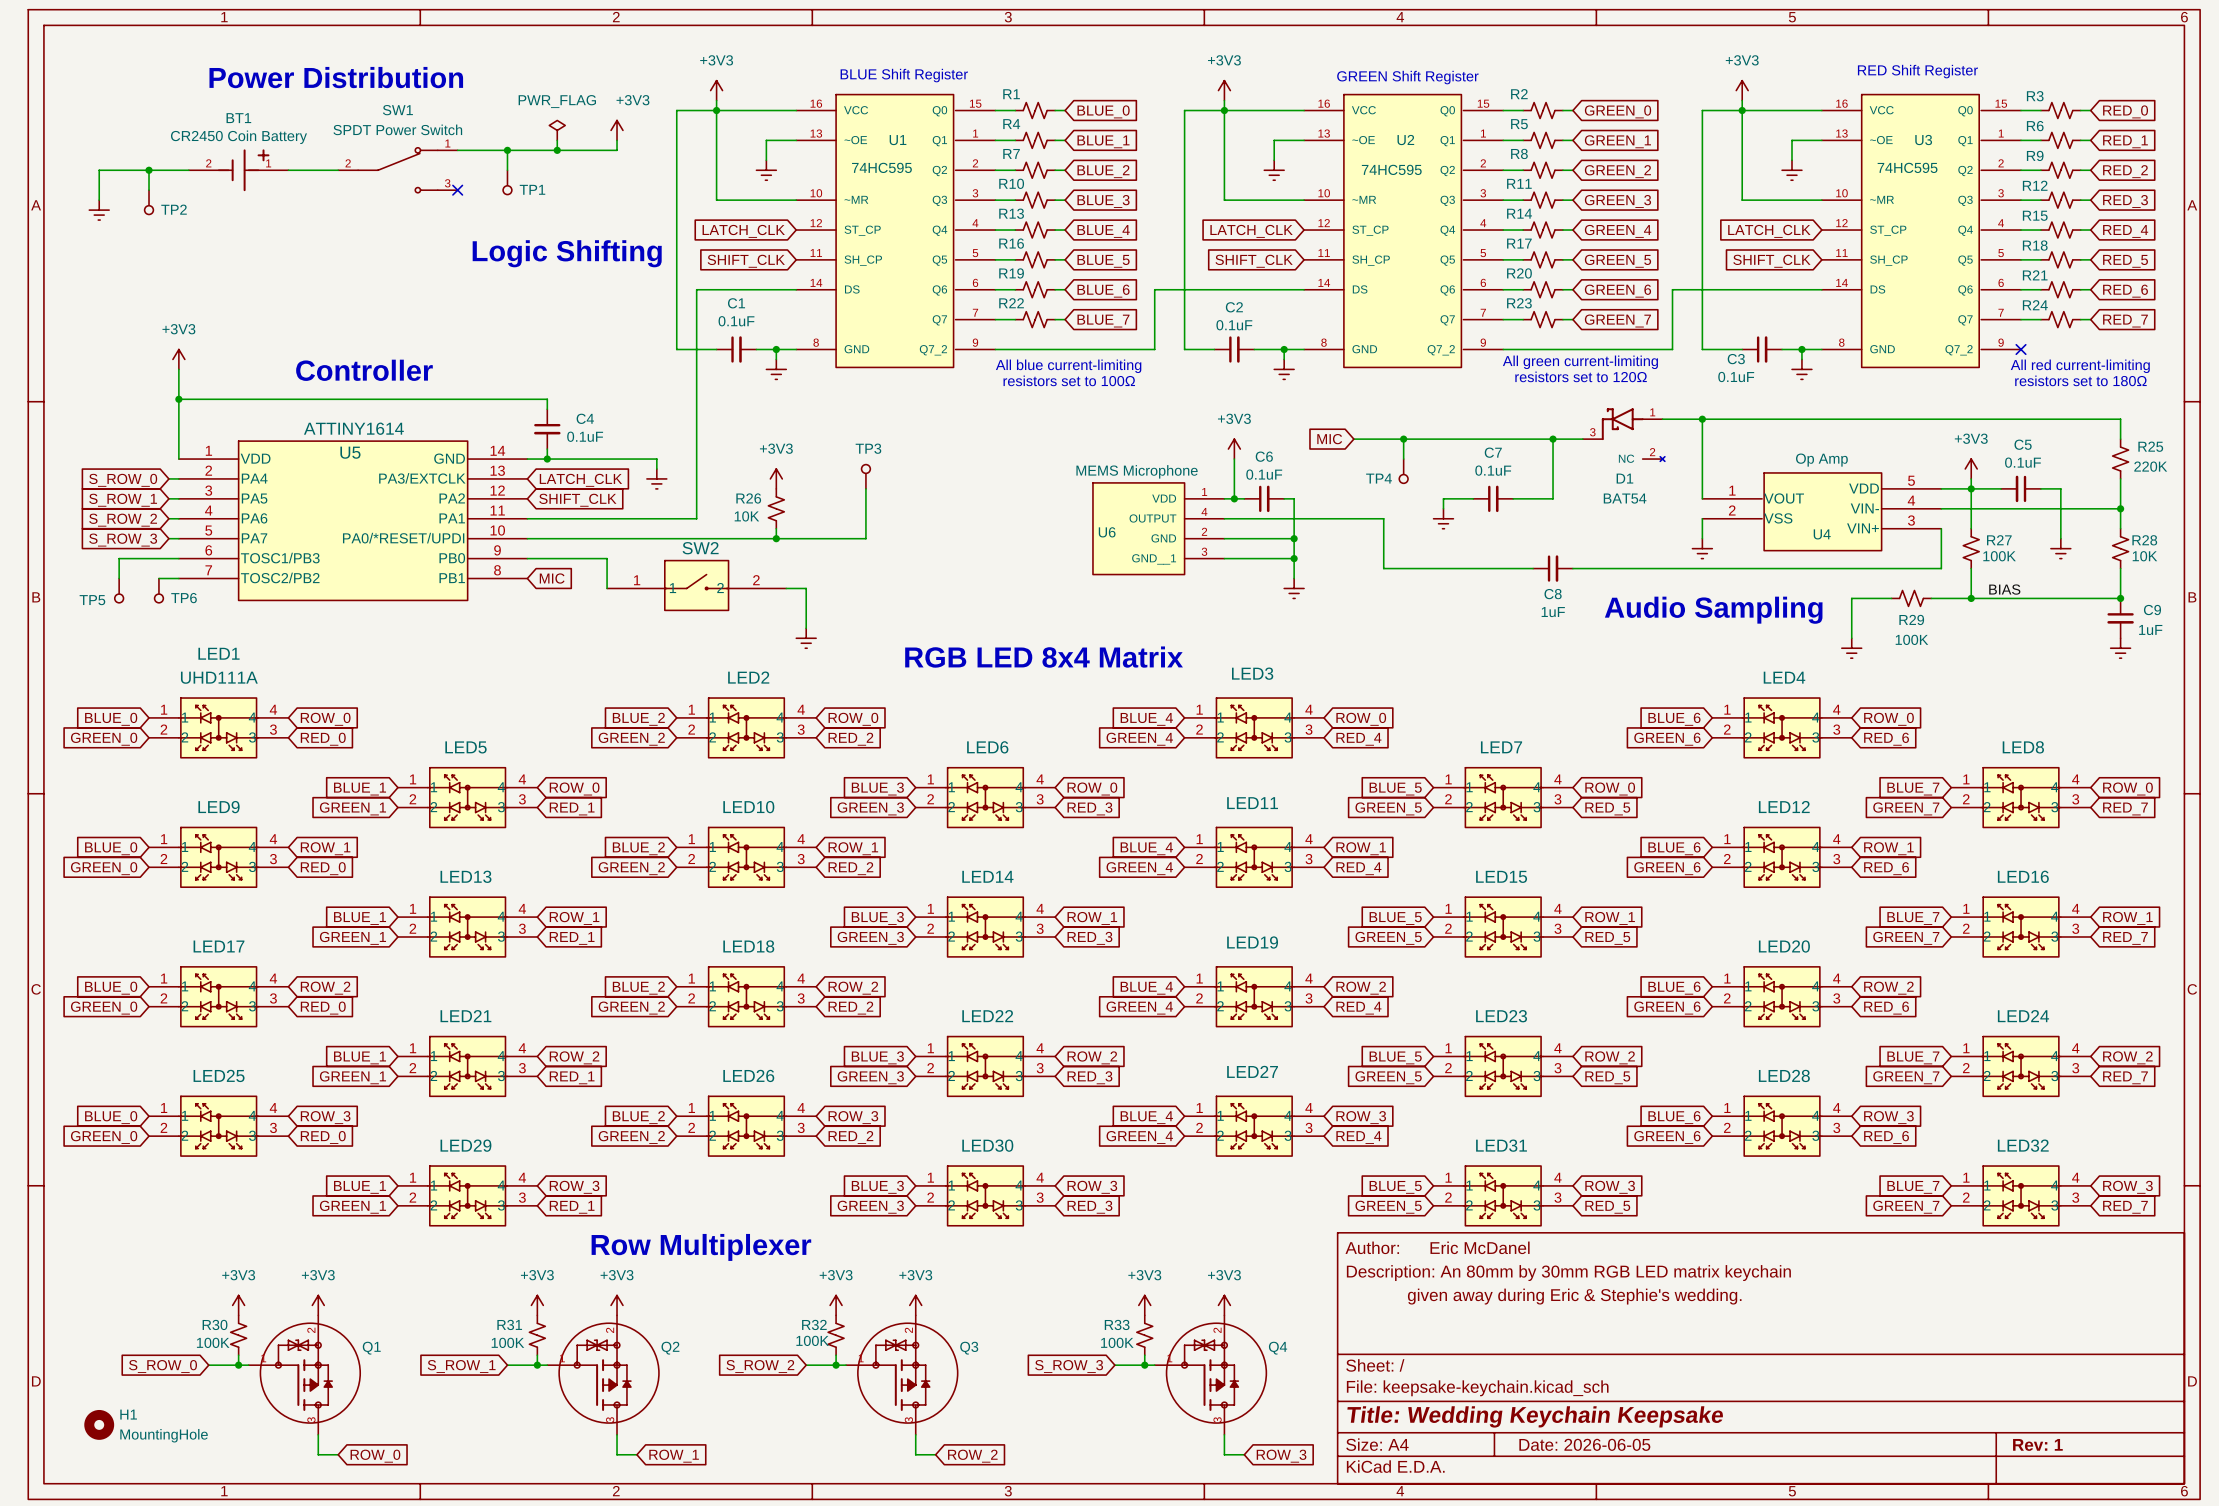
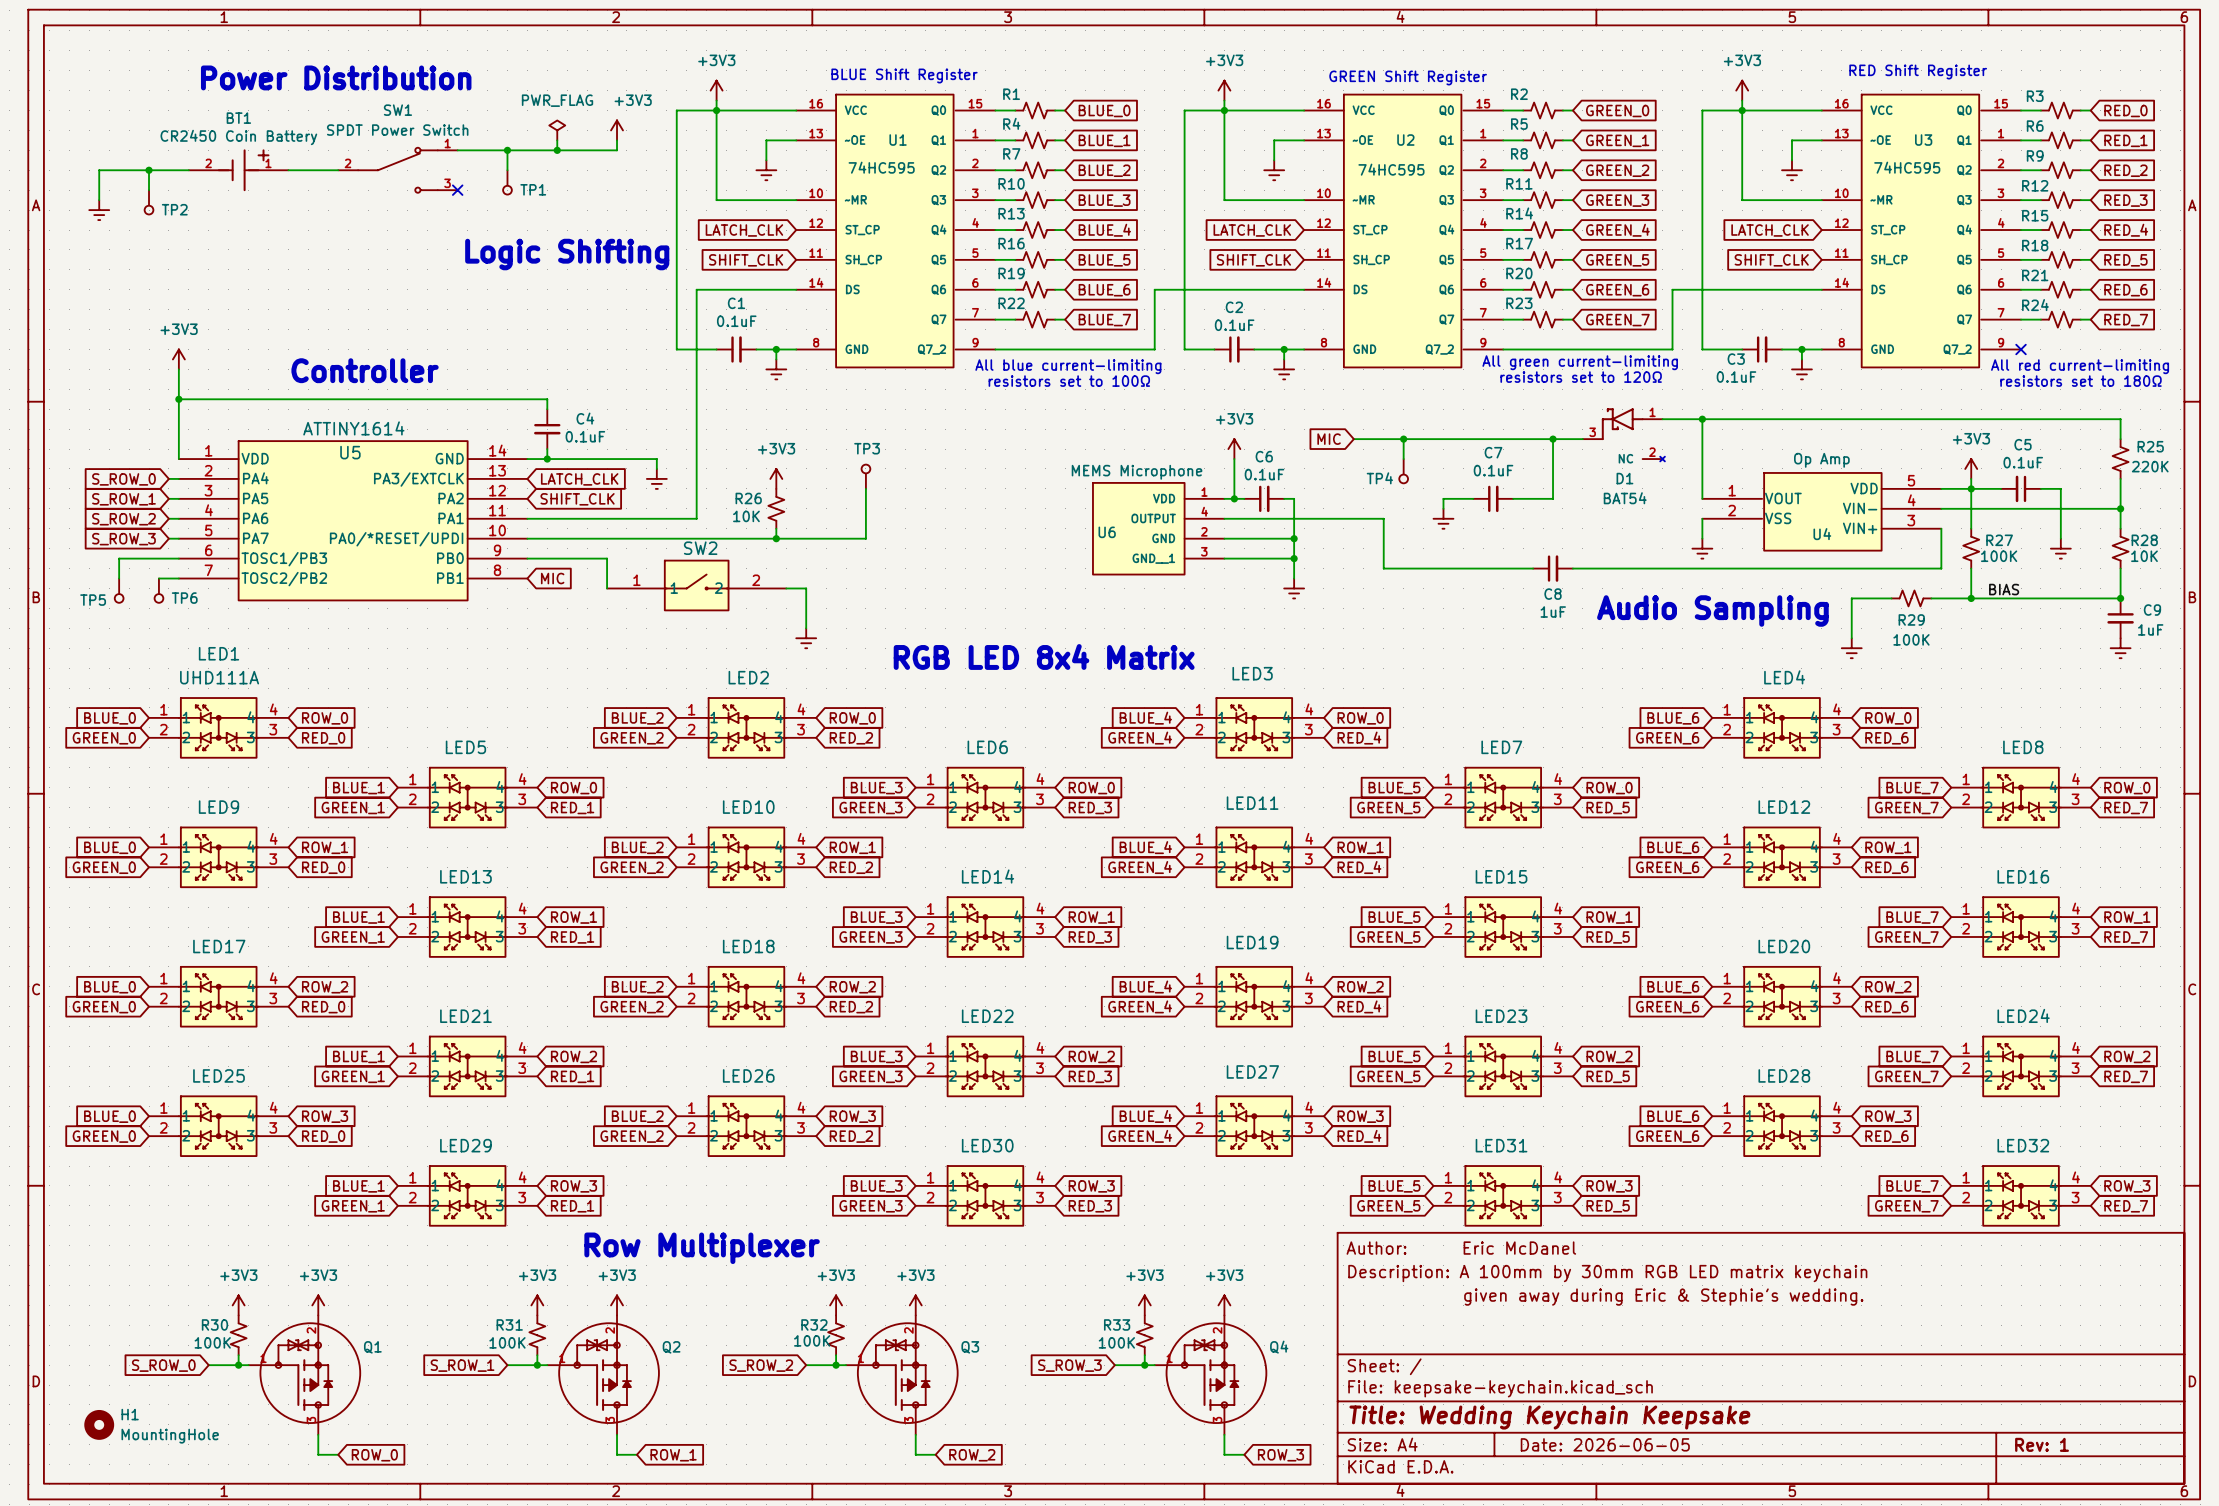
title block: Description: An 80mm by 30mm RGB LED matrix keychain (1568, 1273) -> Description: A 100mm by 30mm RGB LED matrix keychain (1607, 1273)

